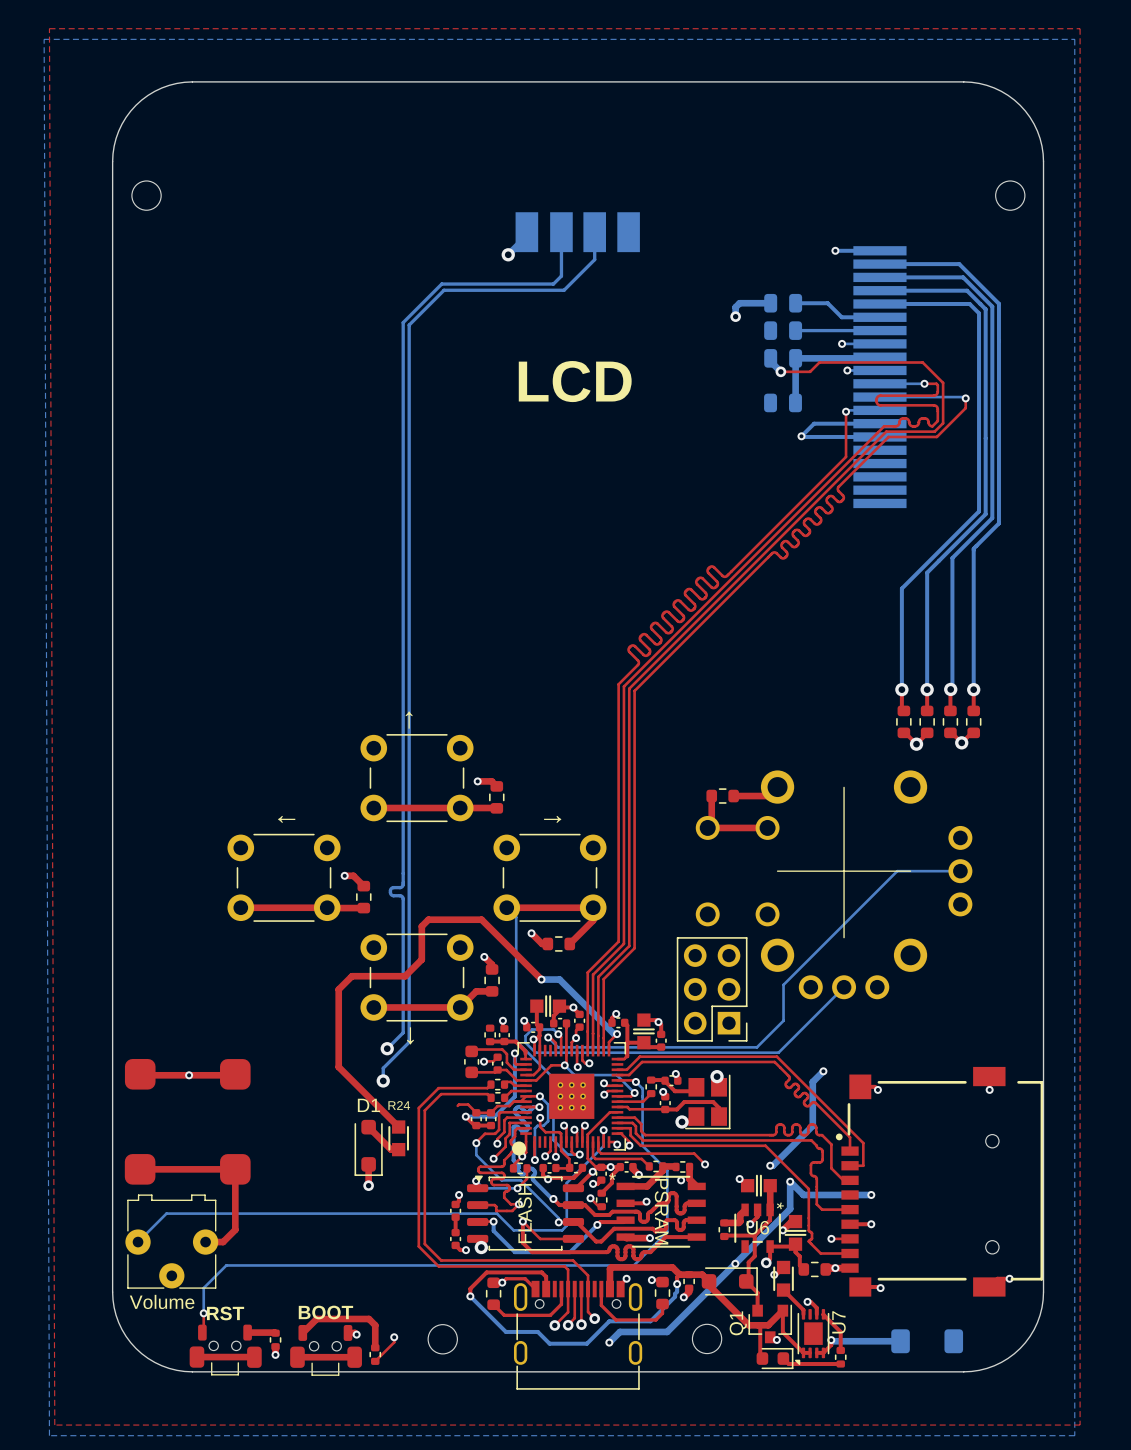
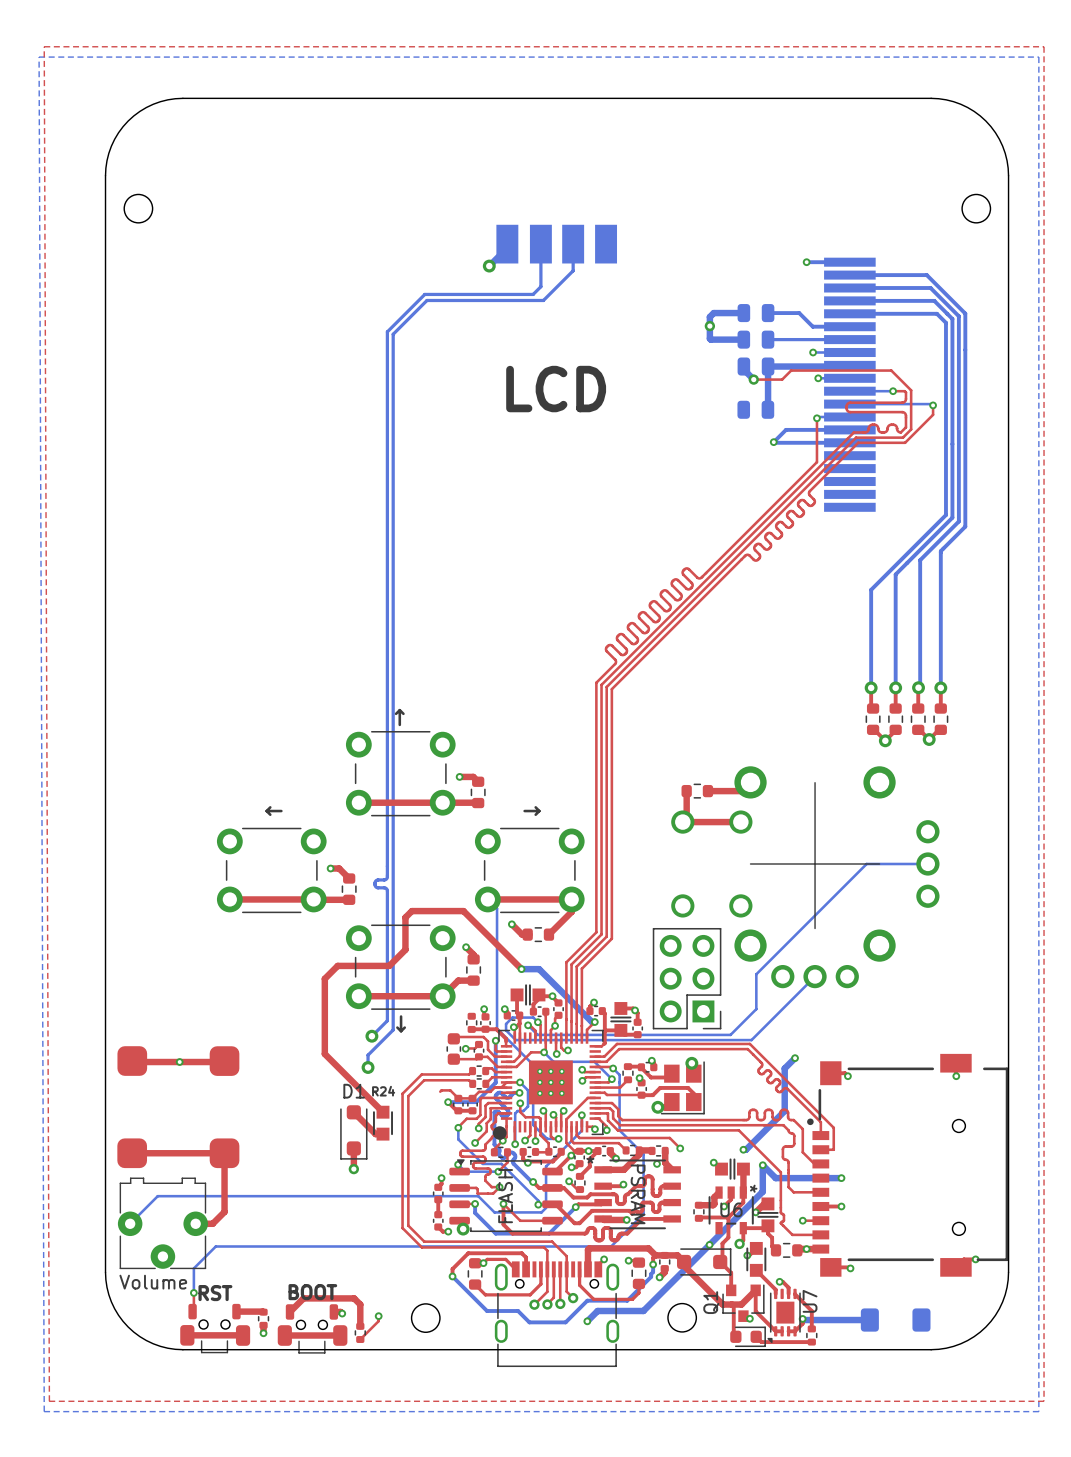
bottom track: none -> (709, 326) (710, 339) (743, 339)

